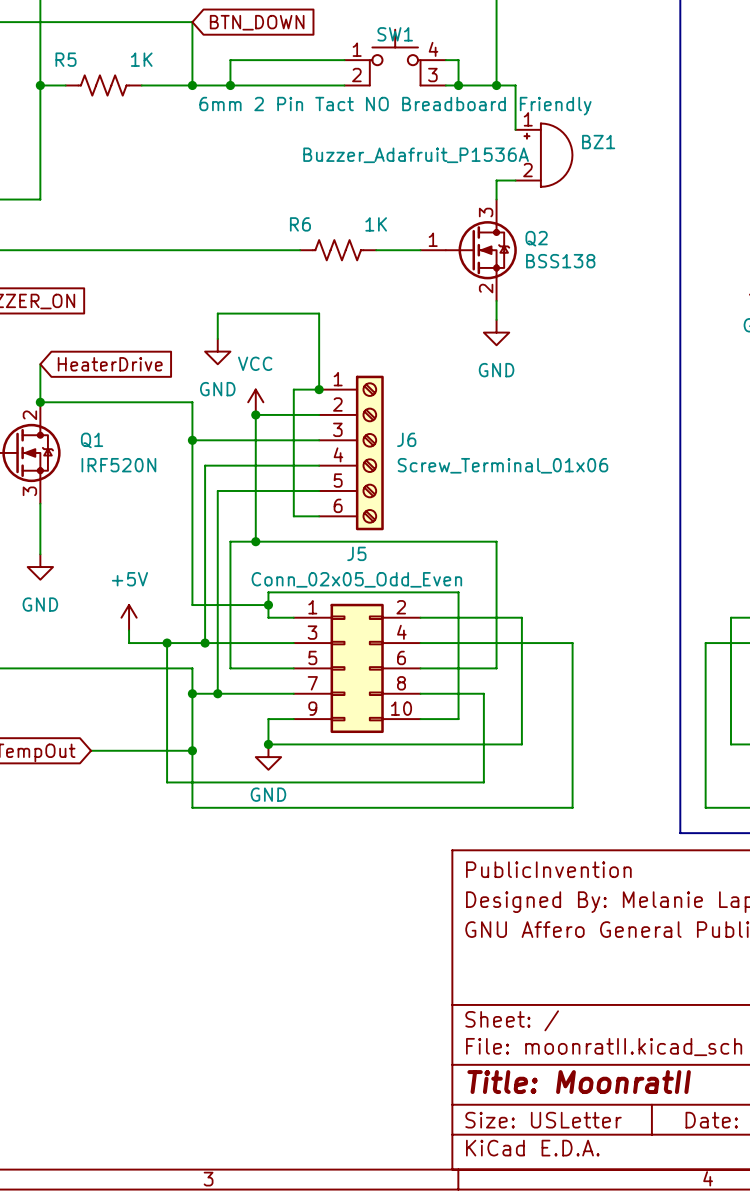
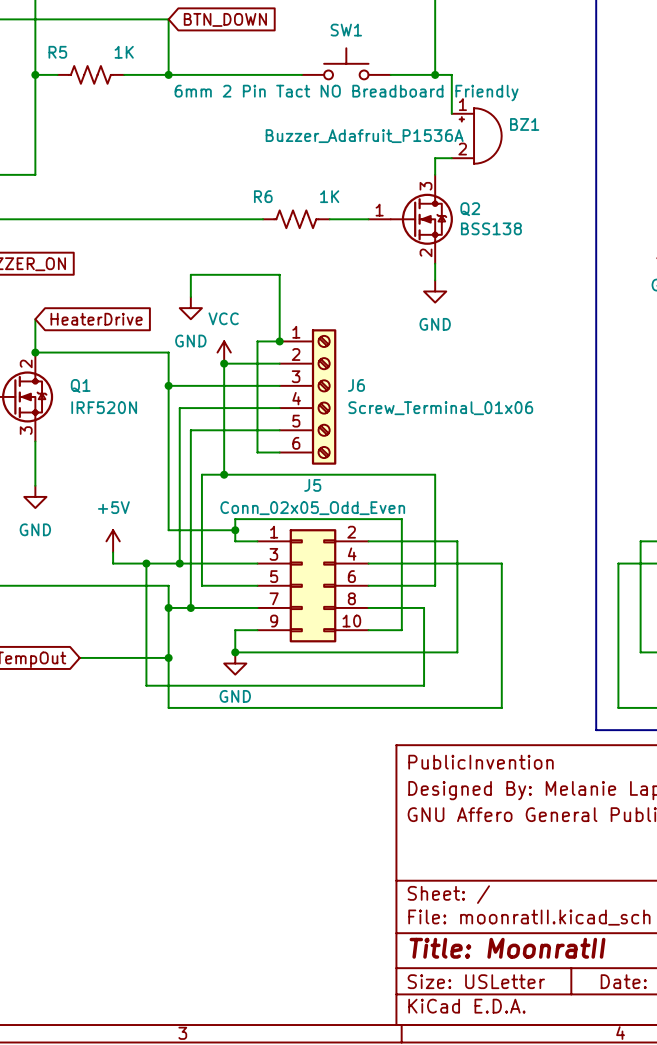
SW1 symbol: [344, 29, 446, 86] -> [301, 48, 391, 80]
wire: (344, 60) (230, 60) (230, 85) -> none
wire: (445, 60) (458, 60) (458, 85) -> none
junction: (230, 85) -> none
junction: (458, 85) -> none

